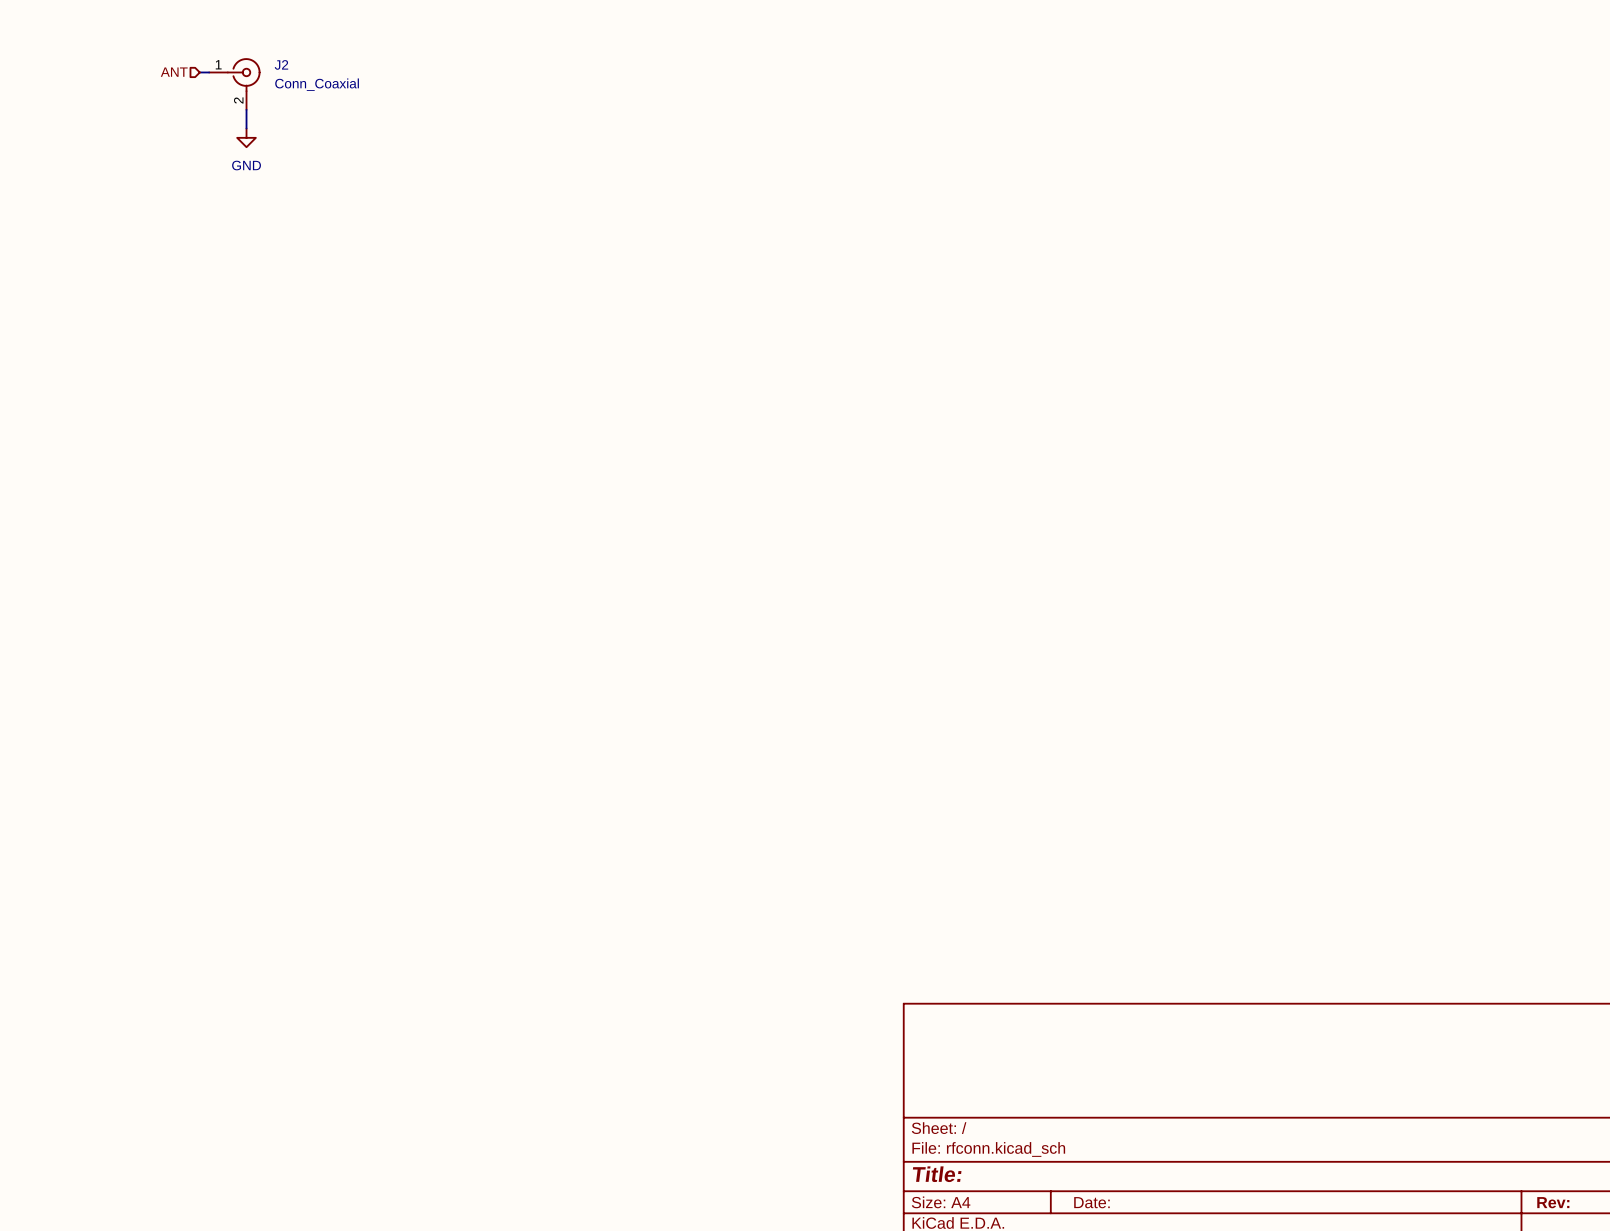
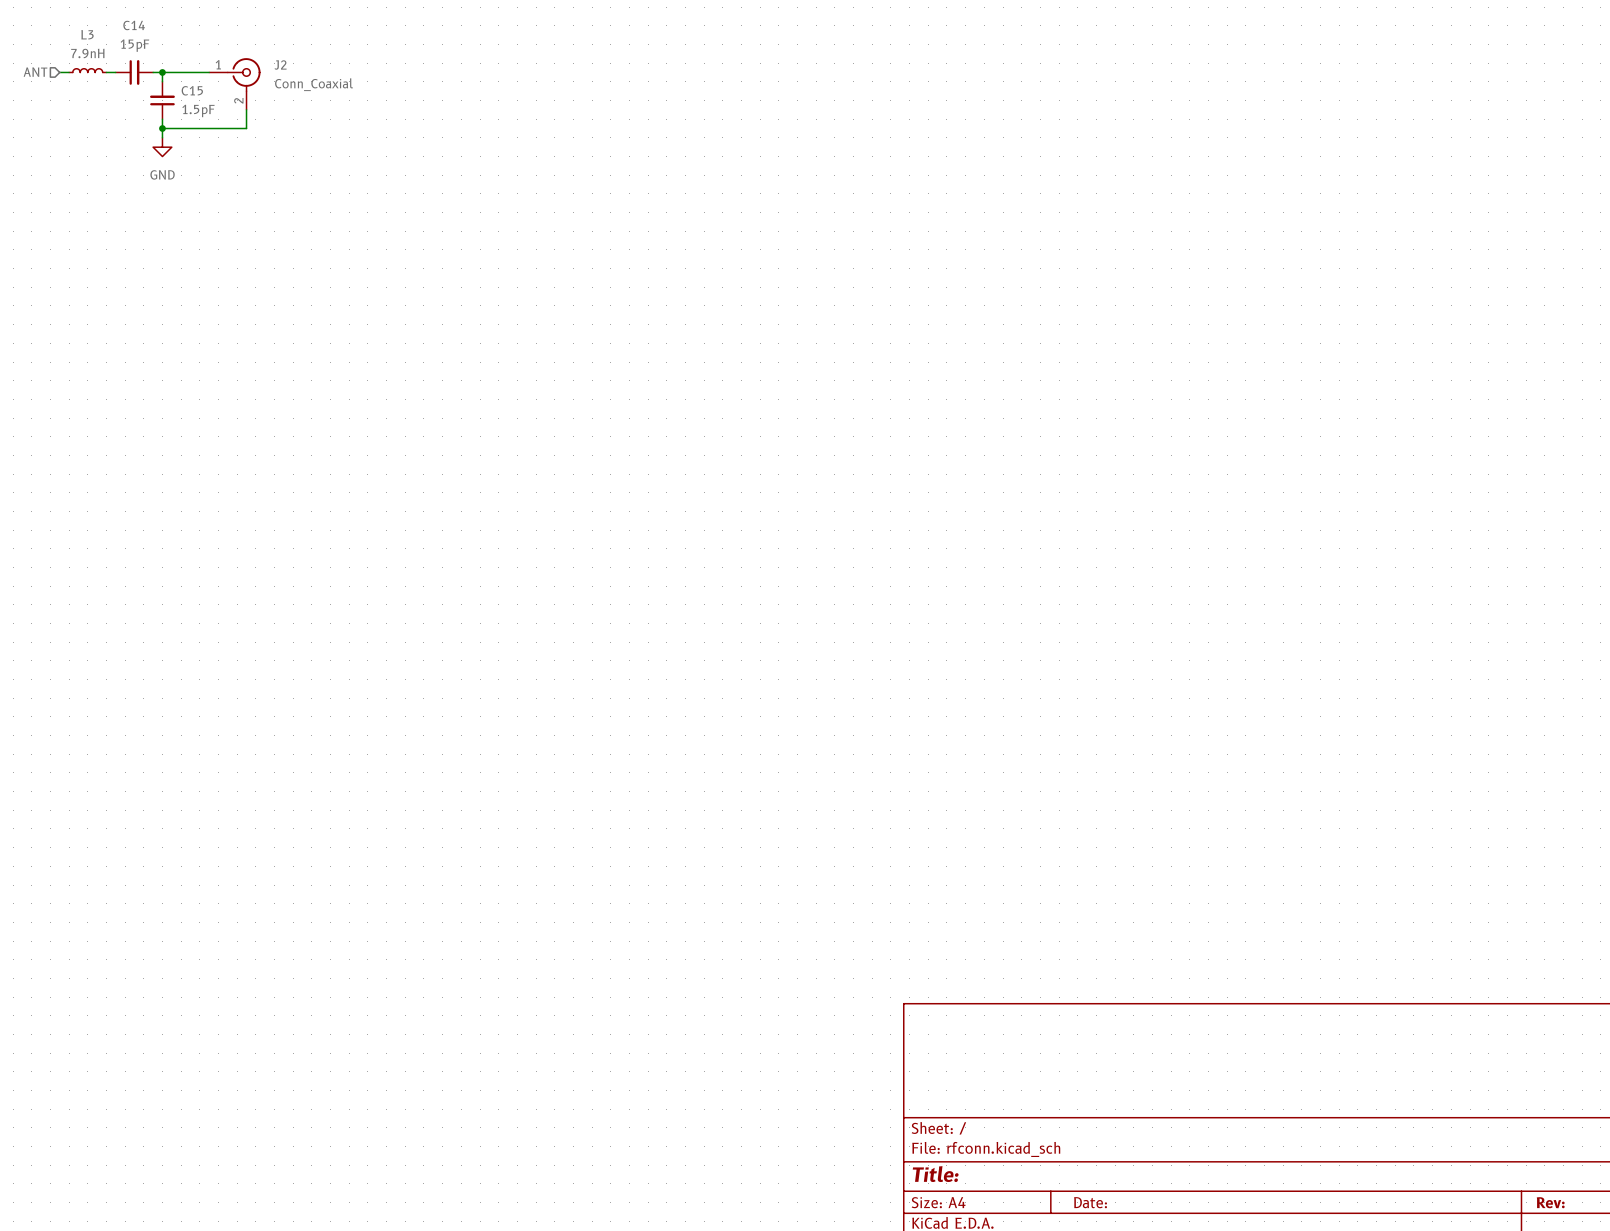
L3: none -> 7.9nH (87, 70)
wire: none -> (59, 72) (69, 72)
wire: none -> (106, 72) (115, 72)
C14: none -> 15pF (134, 72)
wire: none -> (153, 72) (199, 72)
wire: none -> (162, 72) (162, 81)
junction: none -> (162, 72)
hierarchical label position: ANT (174, 72) -> ANT (35, 72)
C15: none -> 1.5pF (162, 100)
wire: none -> (162, 119) (162, 137)
wire: none -> (162, 128) (246, 128)
junction: none -> (162, 128)
power symbol position: GND (246, 137) -> GND (162, 147)

